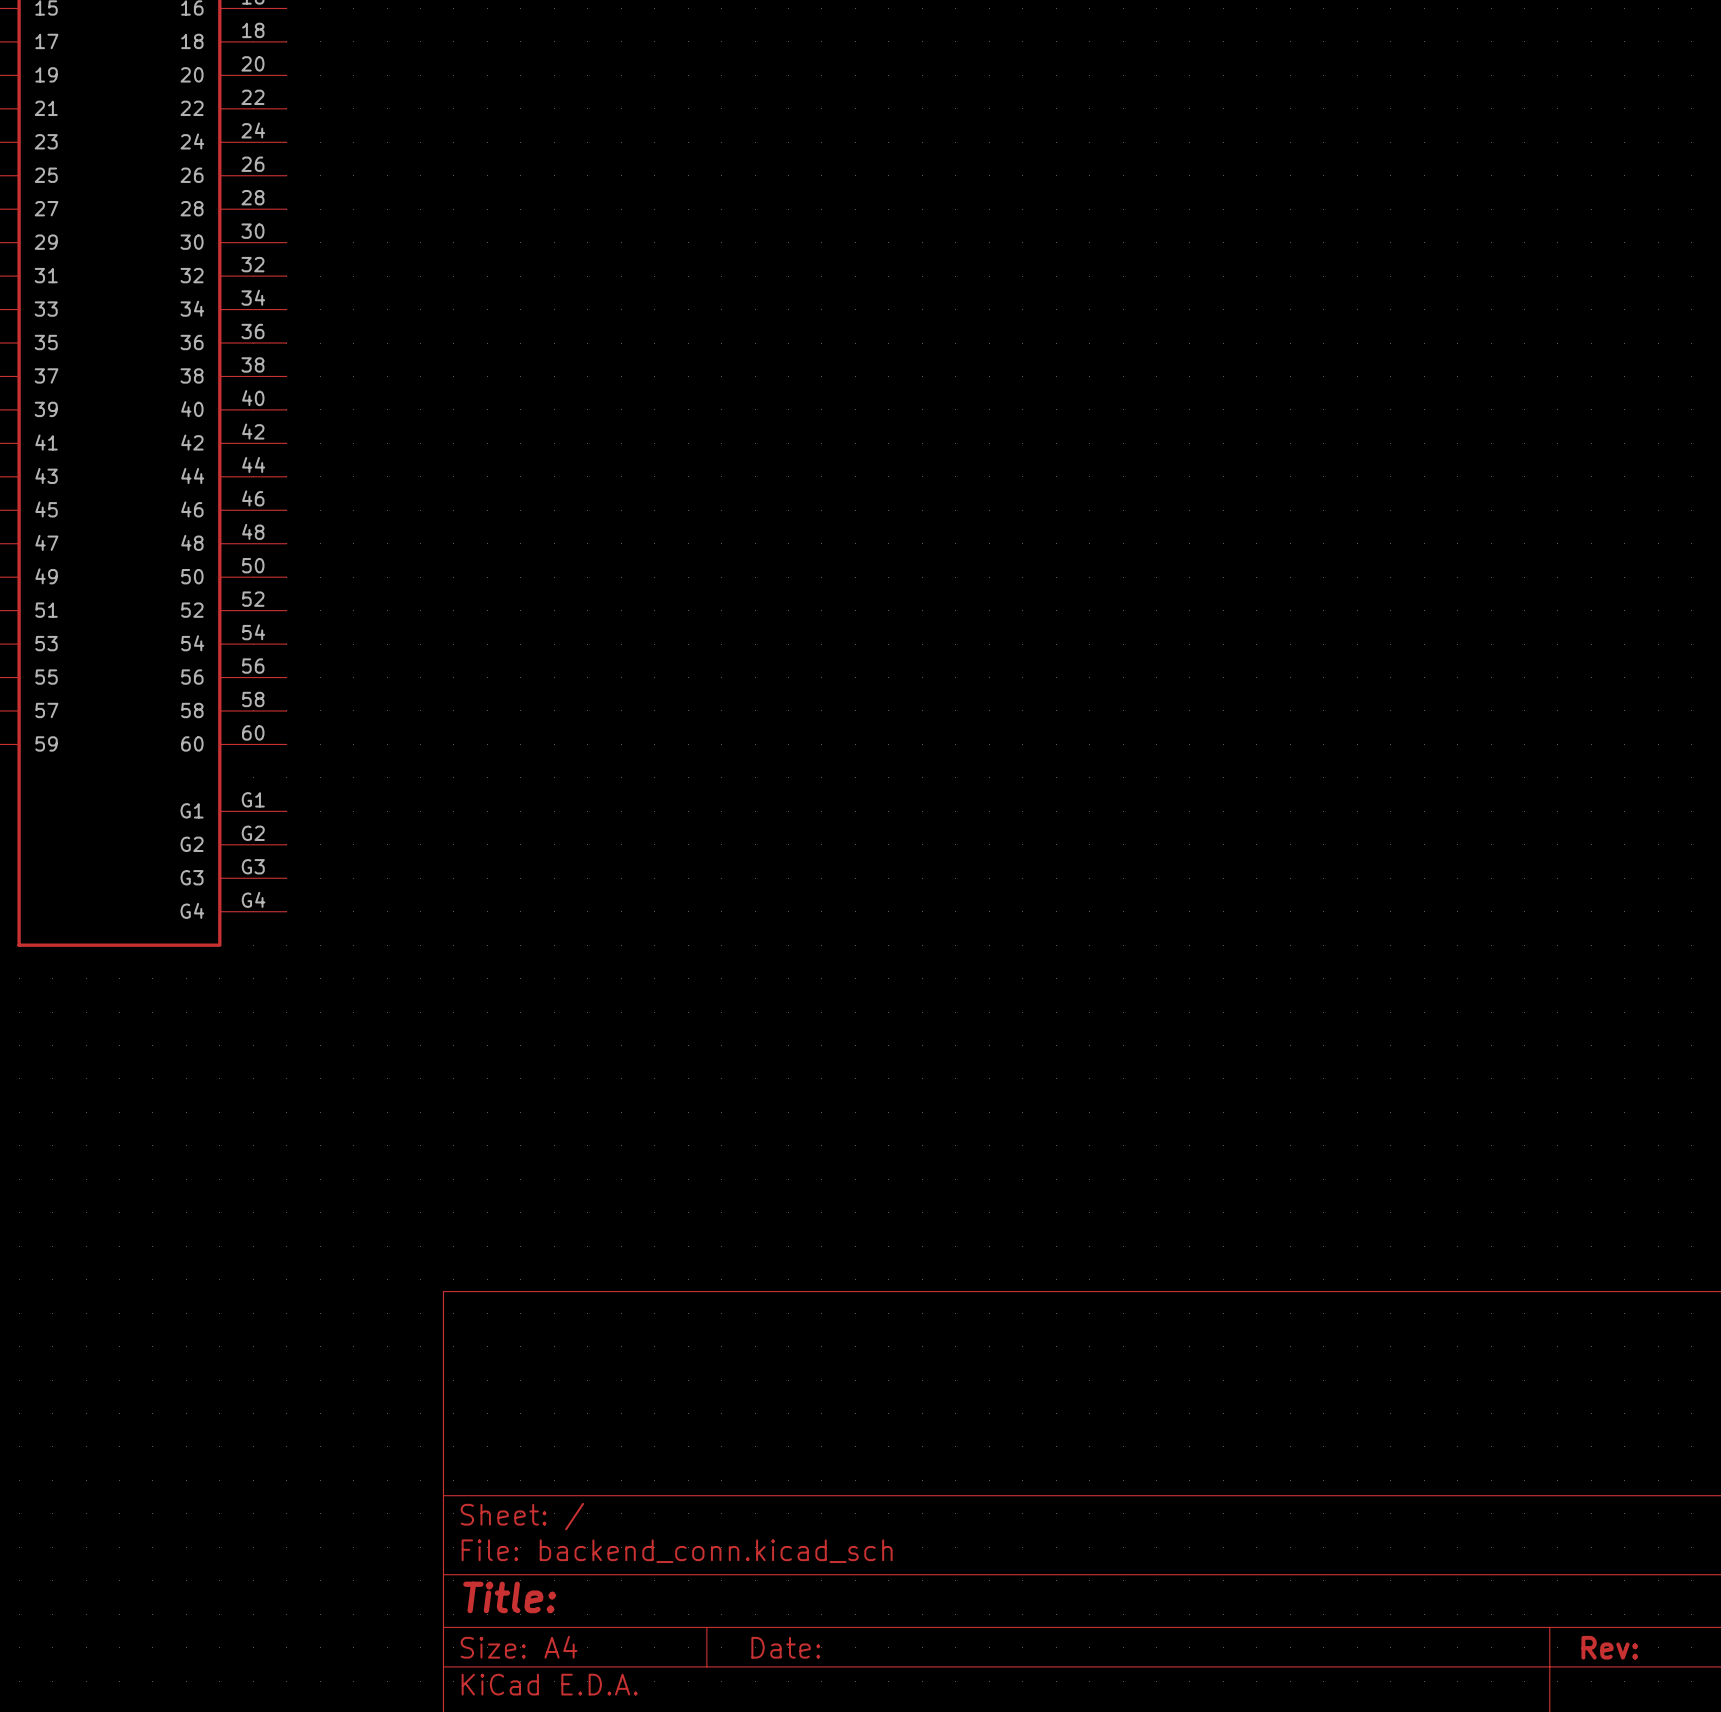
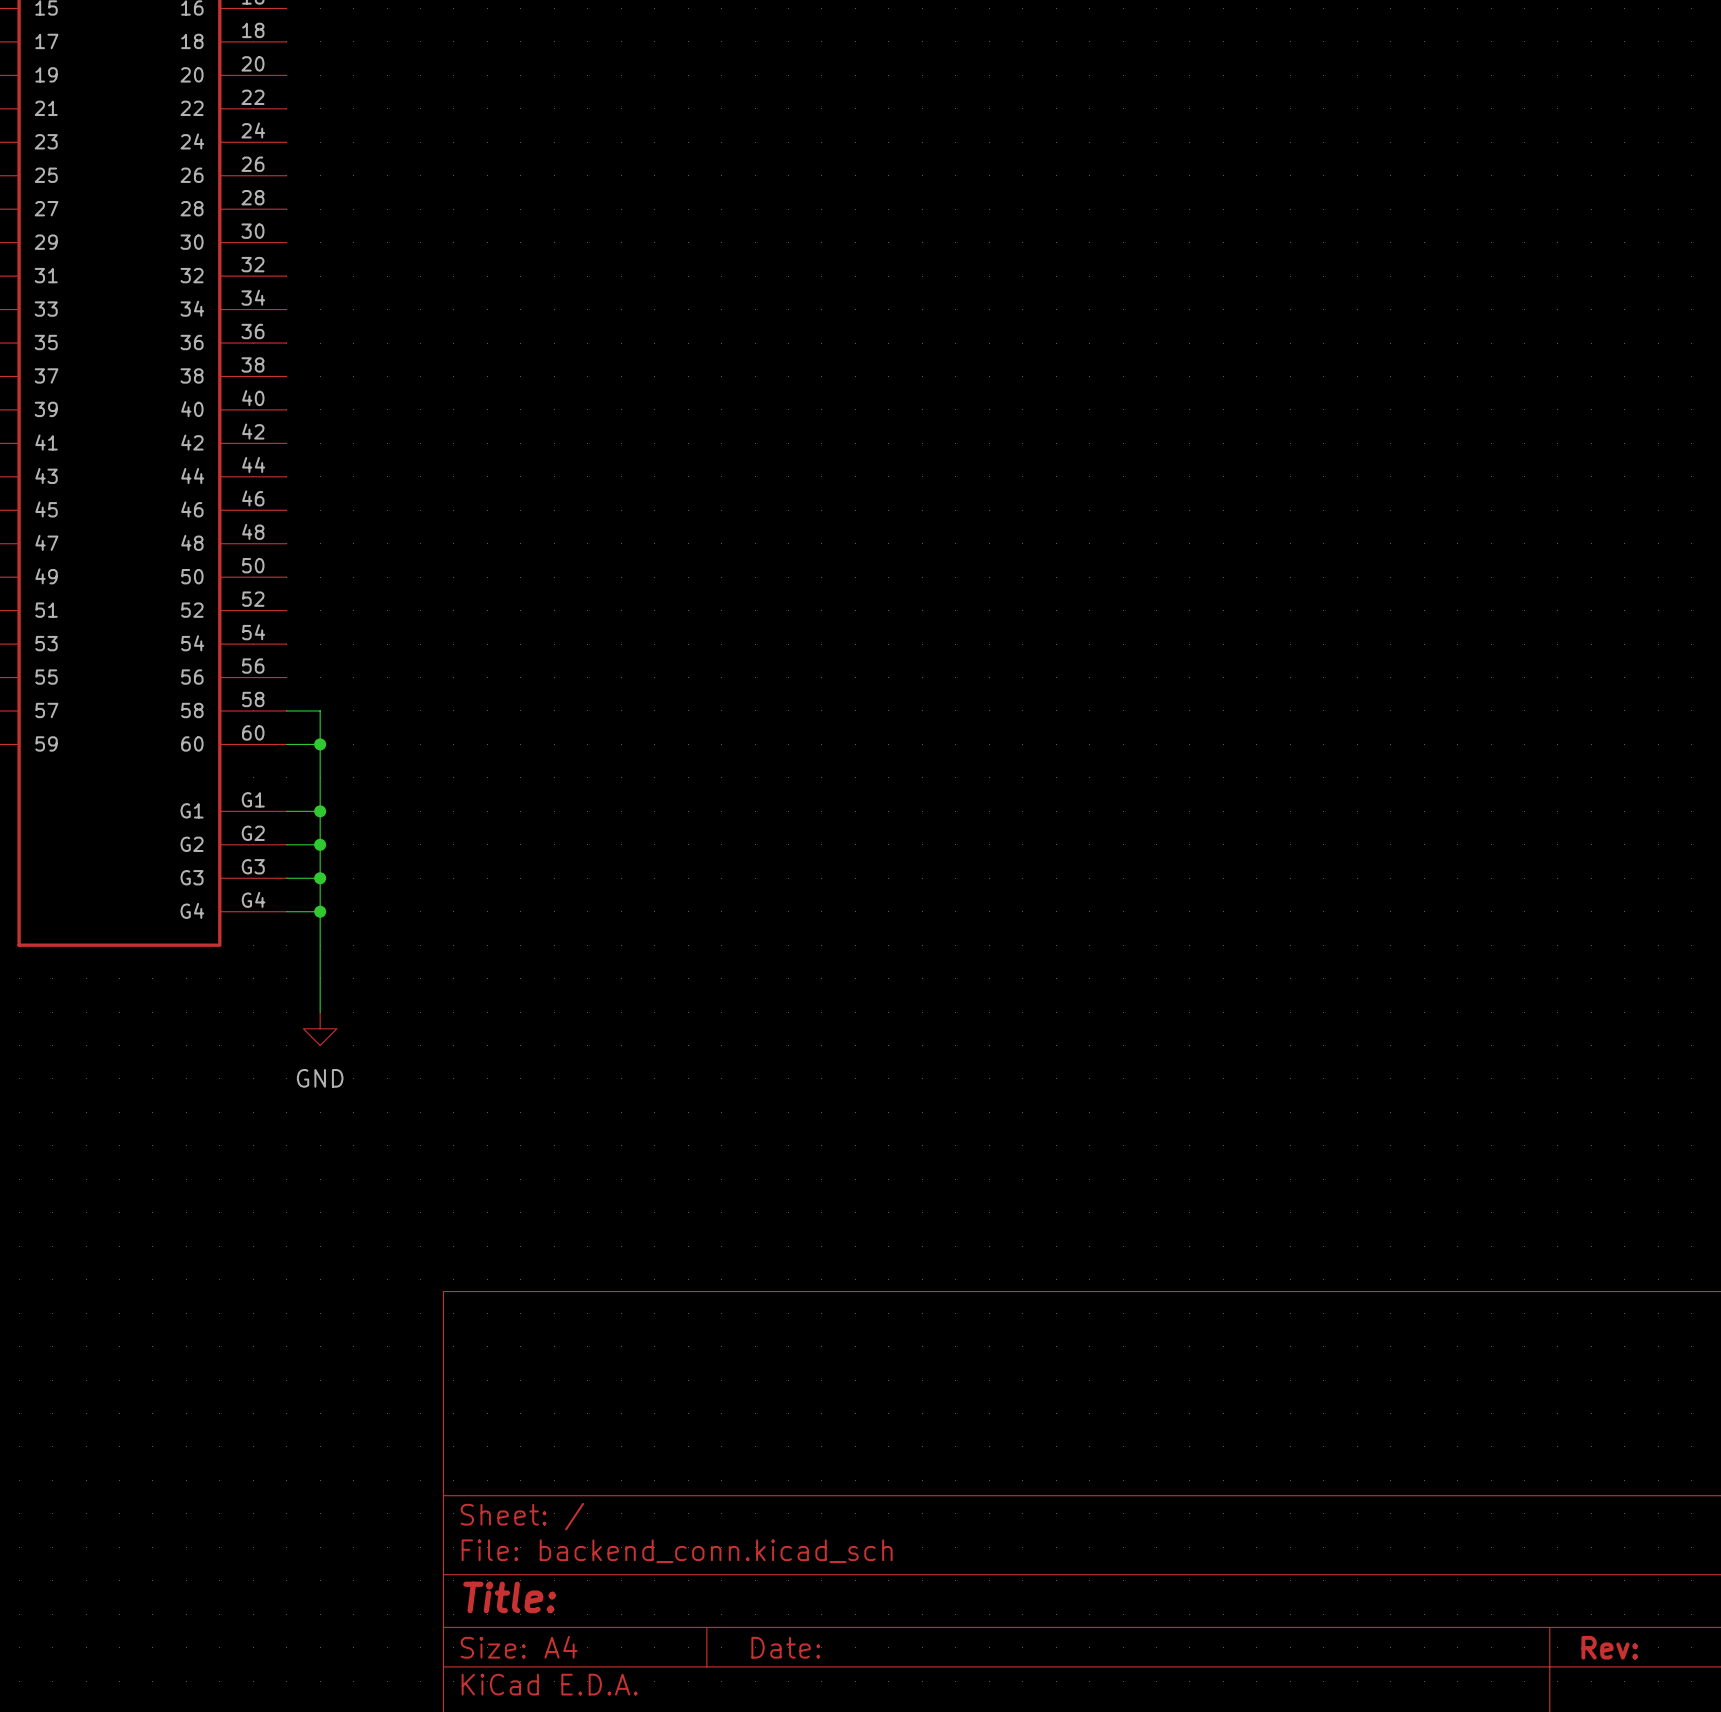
wire: none -> (286, 710) (320, 710) (320, 1012)
wire: none -> (286, 744) (320, 744)
junction: none -> (320, 744)
wire: none -> (286, 811) (320, 811)
junction: none -> (320, 811)
wire: none -> (286, 844) (320, 844)
junction: none -> (320, 844)
wire: none -> (286, 878) (320, 878)
junction: none -> (320, 878)
wire: none -> (286, 911) (320, 911)
junction: none -> (320, 911)
power symbol: none -> GND (320, 1028)

